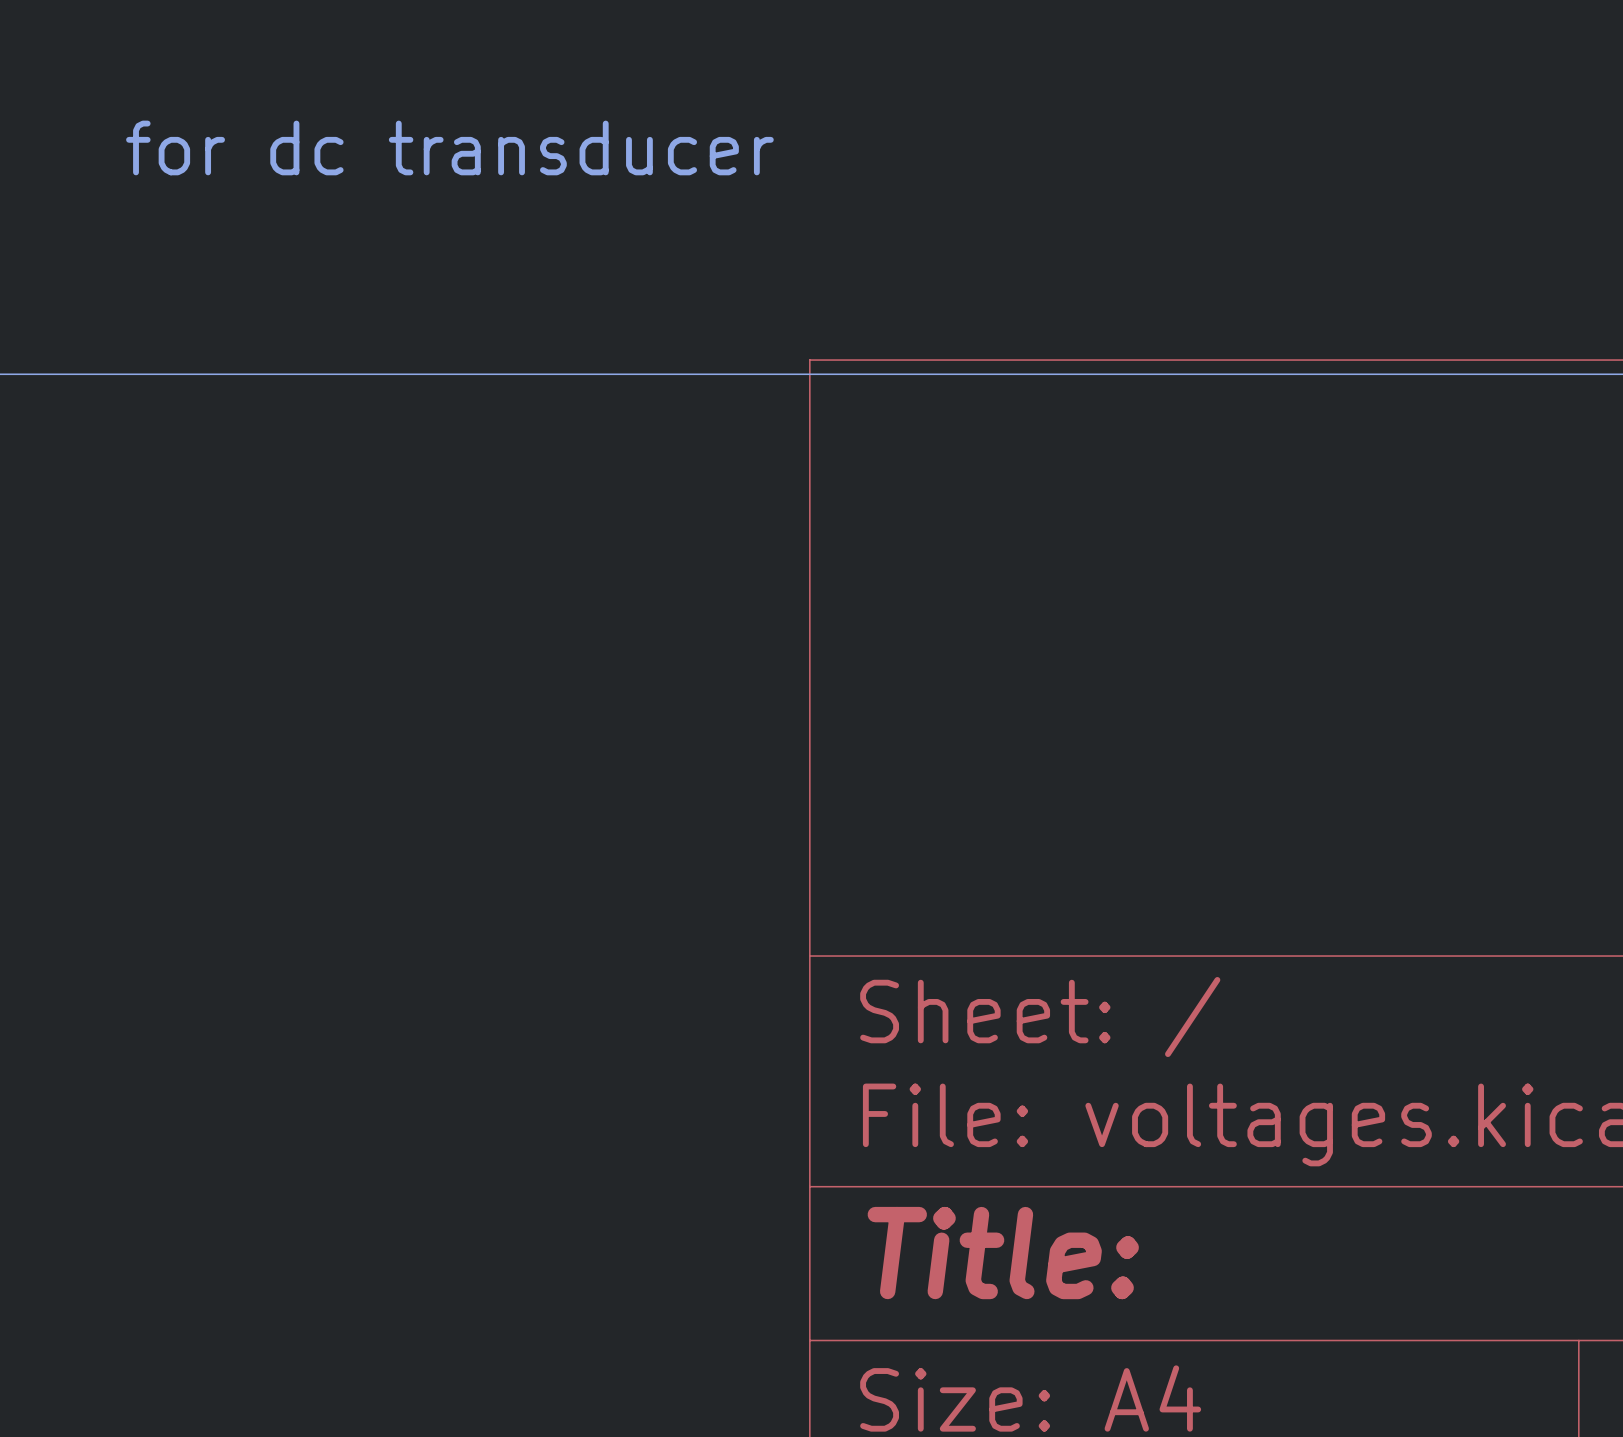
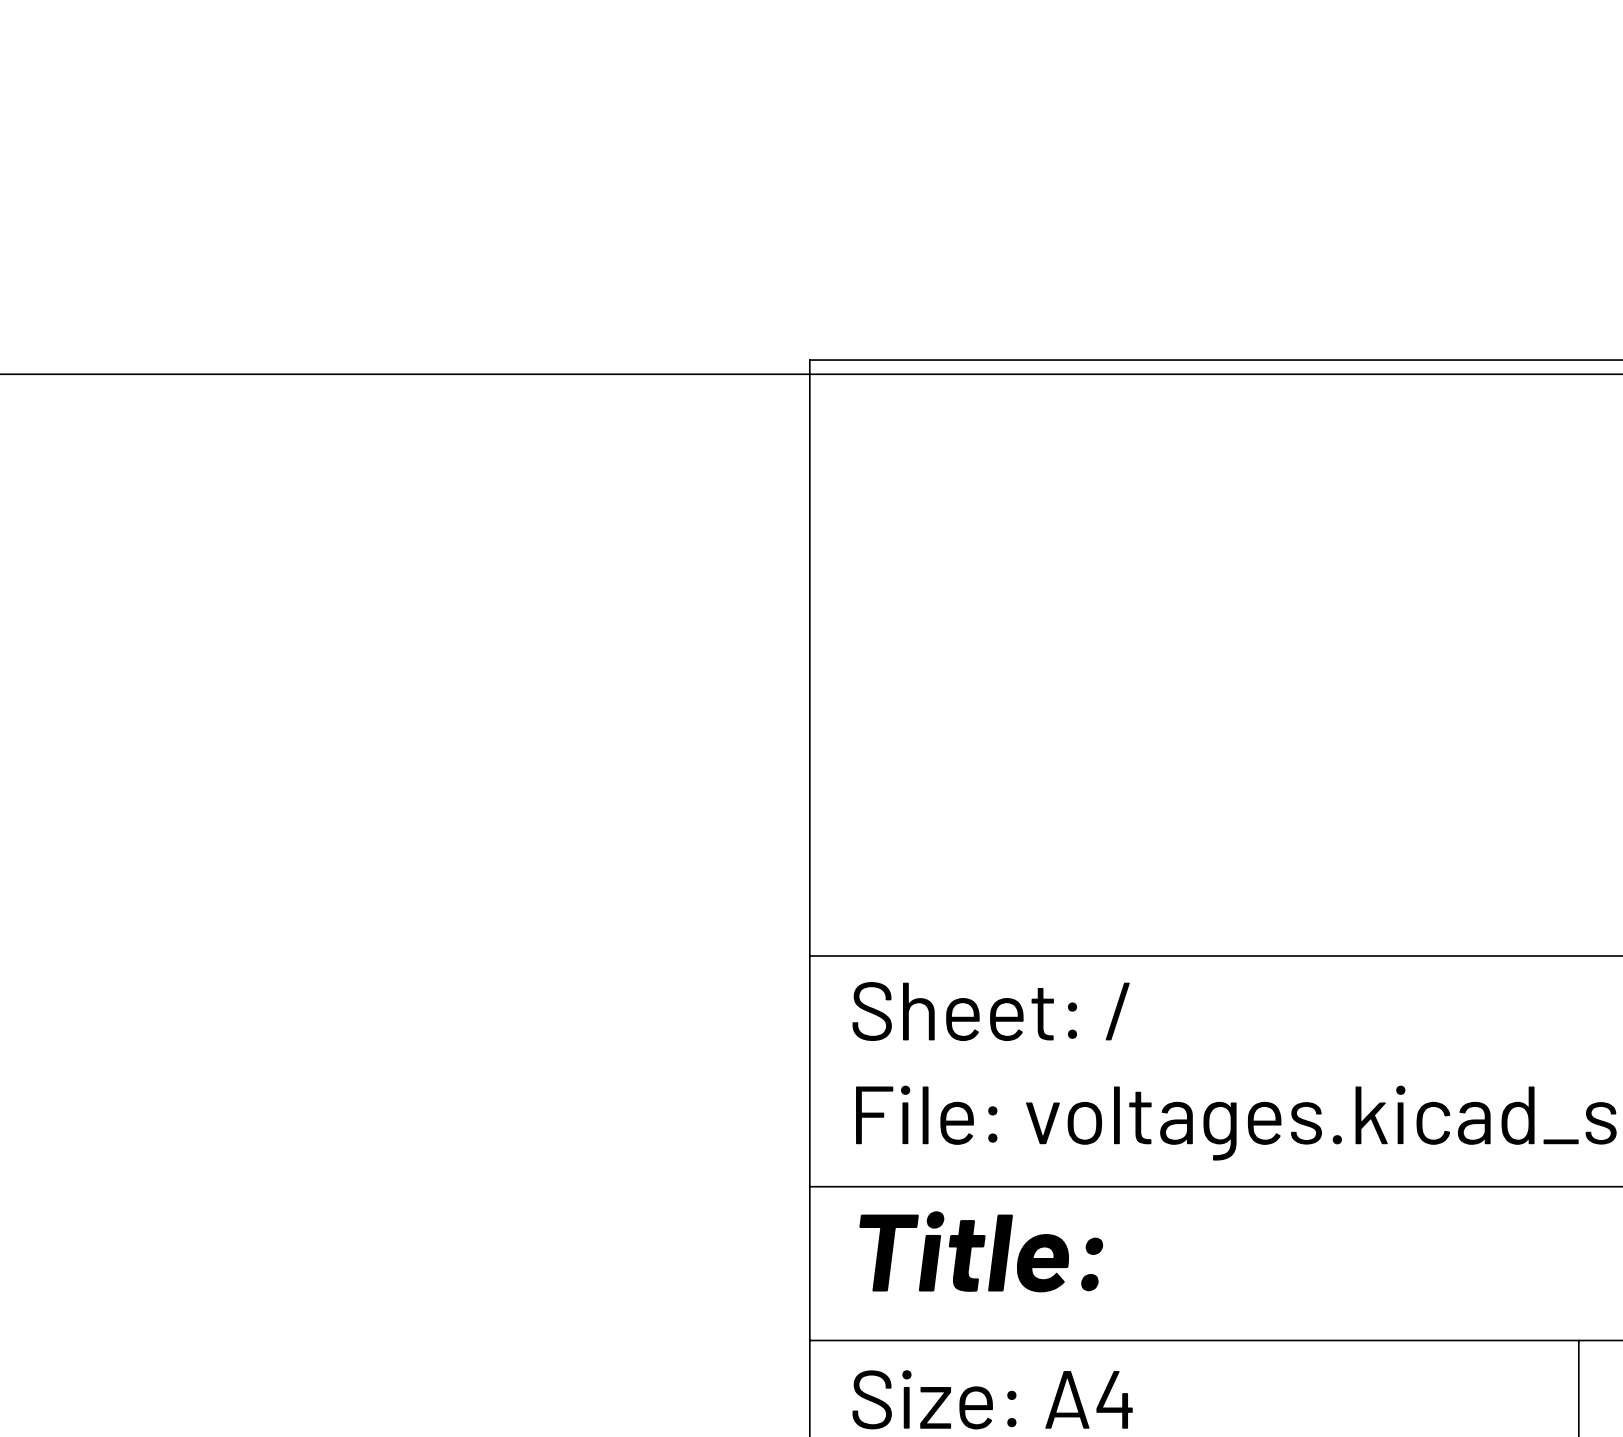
text: for dc transducer (449, 147) -> none

